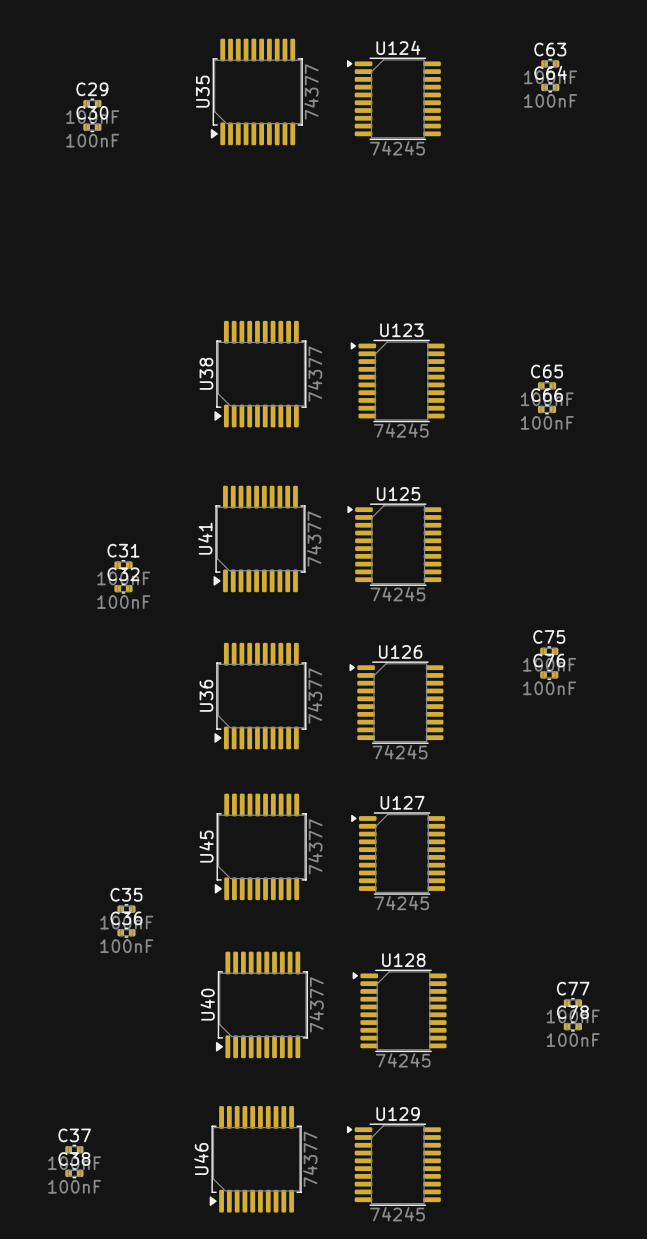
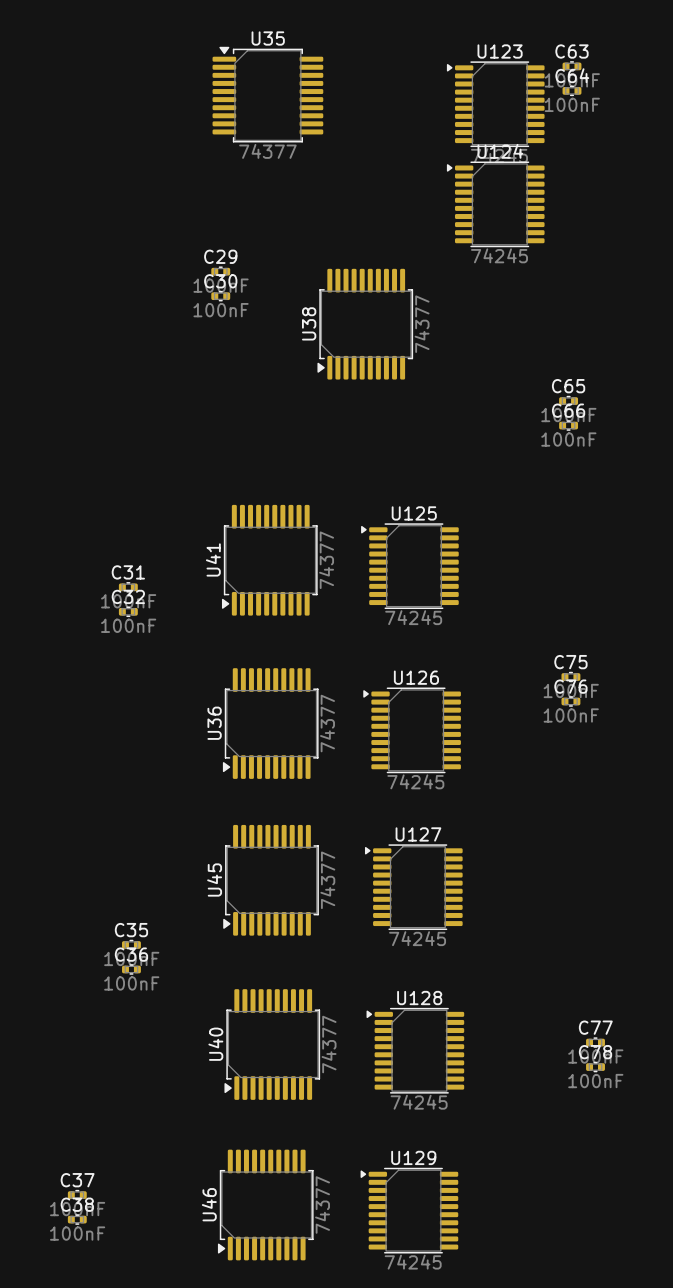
U35 rotation: 0° (256, 91) -> 90° clockwise (267, 94)
U124 position: (393, 98) -> (495, 204)
C29 position: (92, 103) -> (220, 271)
C30 position: (92, 127) -> (220, 296)
U38 position: (260, 374) -> (365, 324)
U123 position: (397, 381) -> (495, 104)

